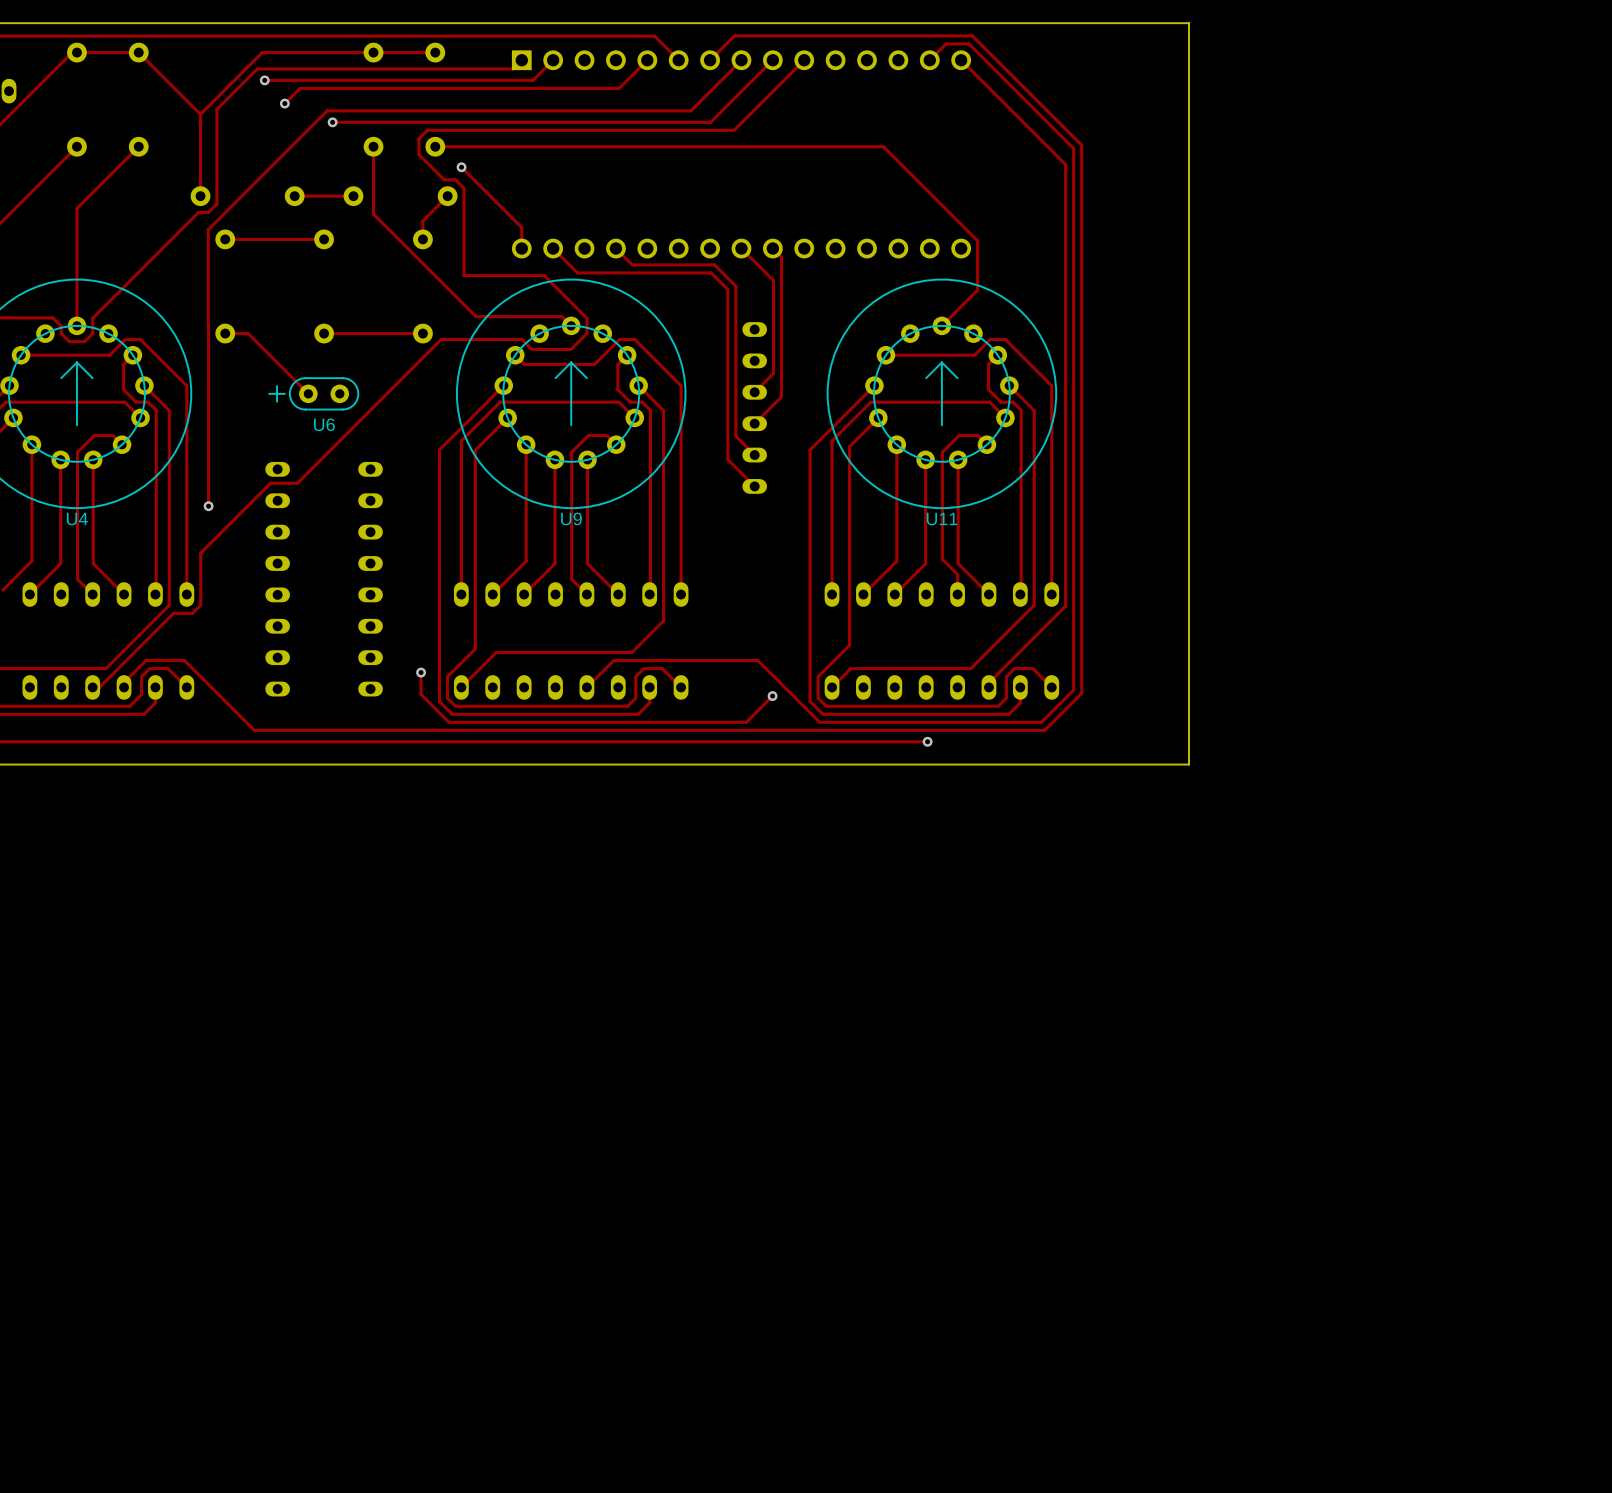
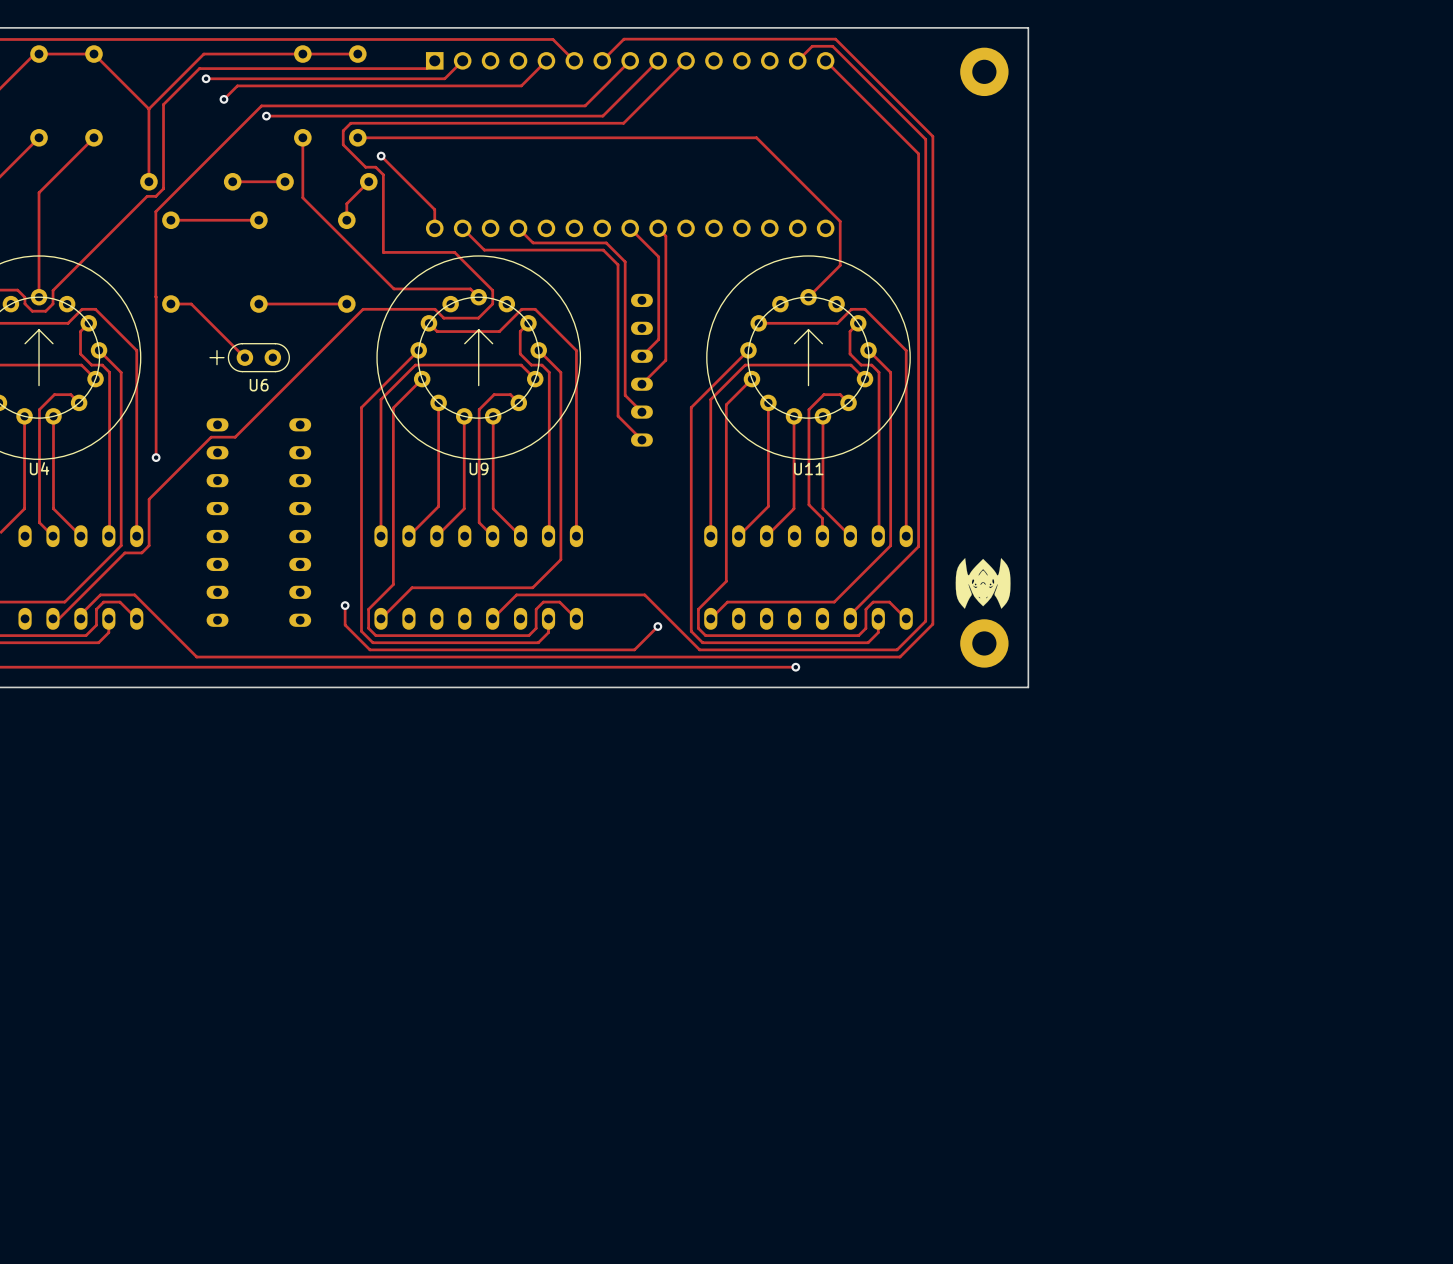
part: none -> (984, 71)
drawing: none -> [955, 558, 1011, 609]
part: none -> (984, 643)

